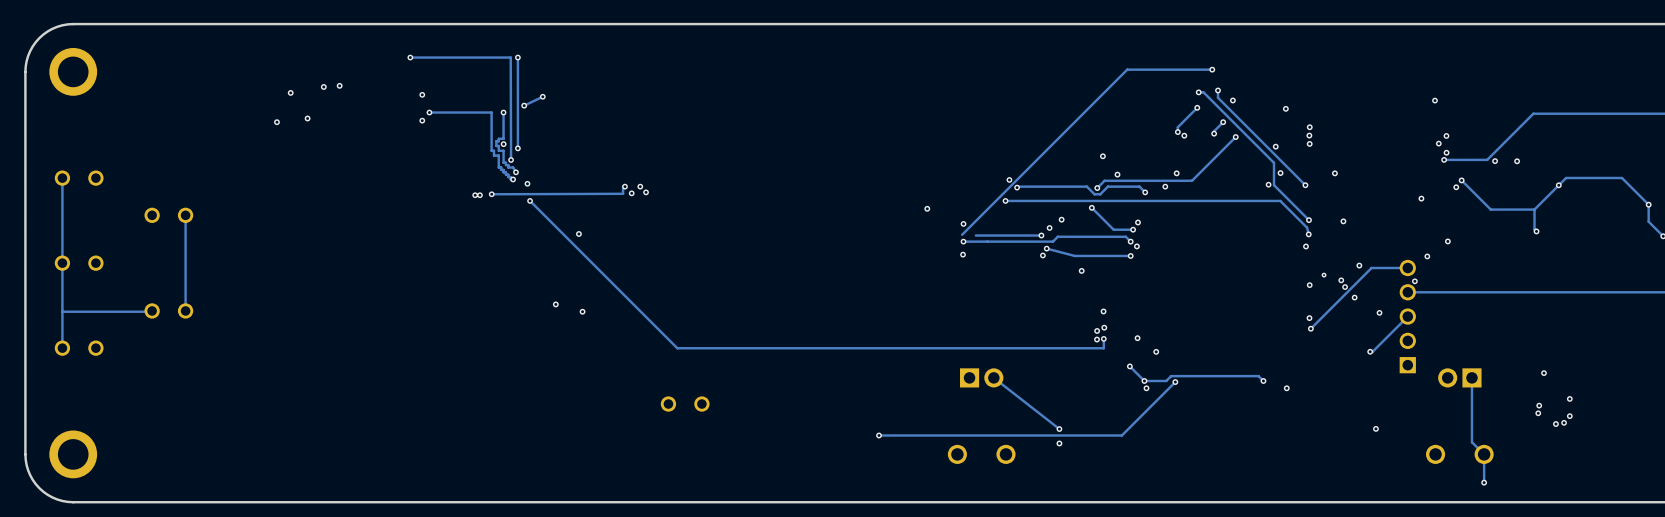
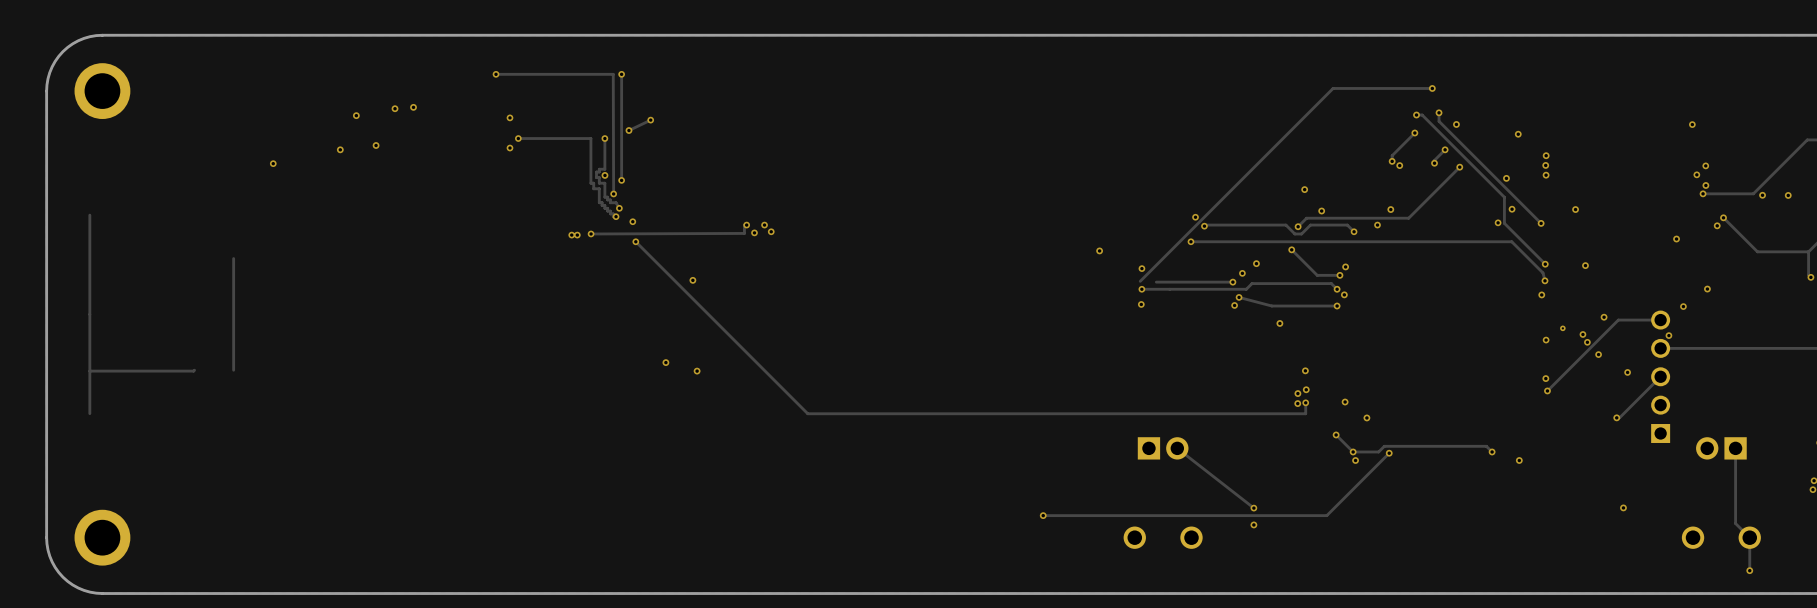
via: none -> (273, 163)
part: (79, 178) -> none
part: (168, 215) -> none
part: (79, 263) -> none
part: (168, 310) -> none
part: (79, 348) -> none
part: (685, 404) -> none

